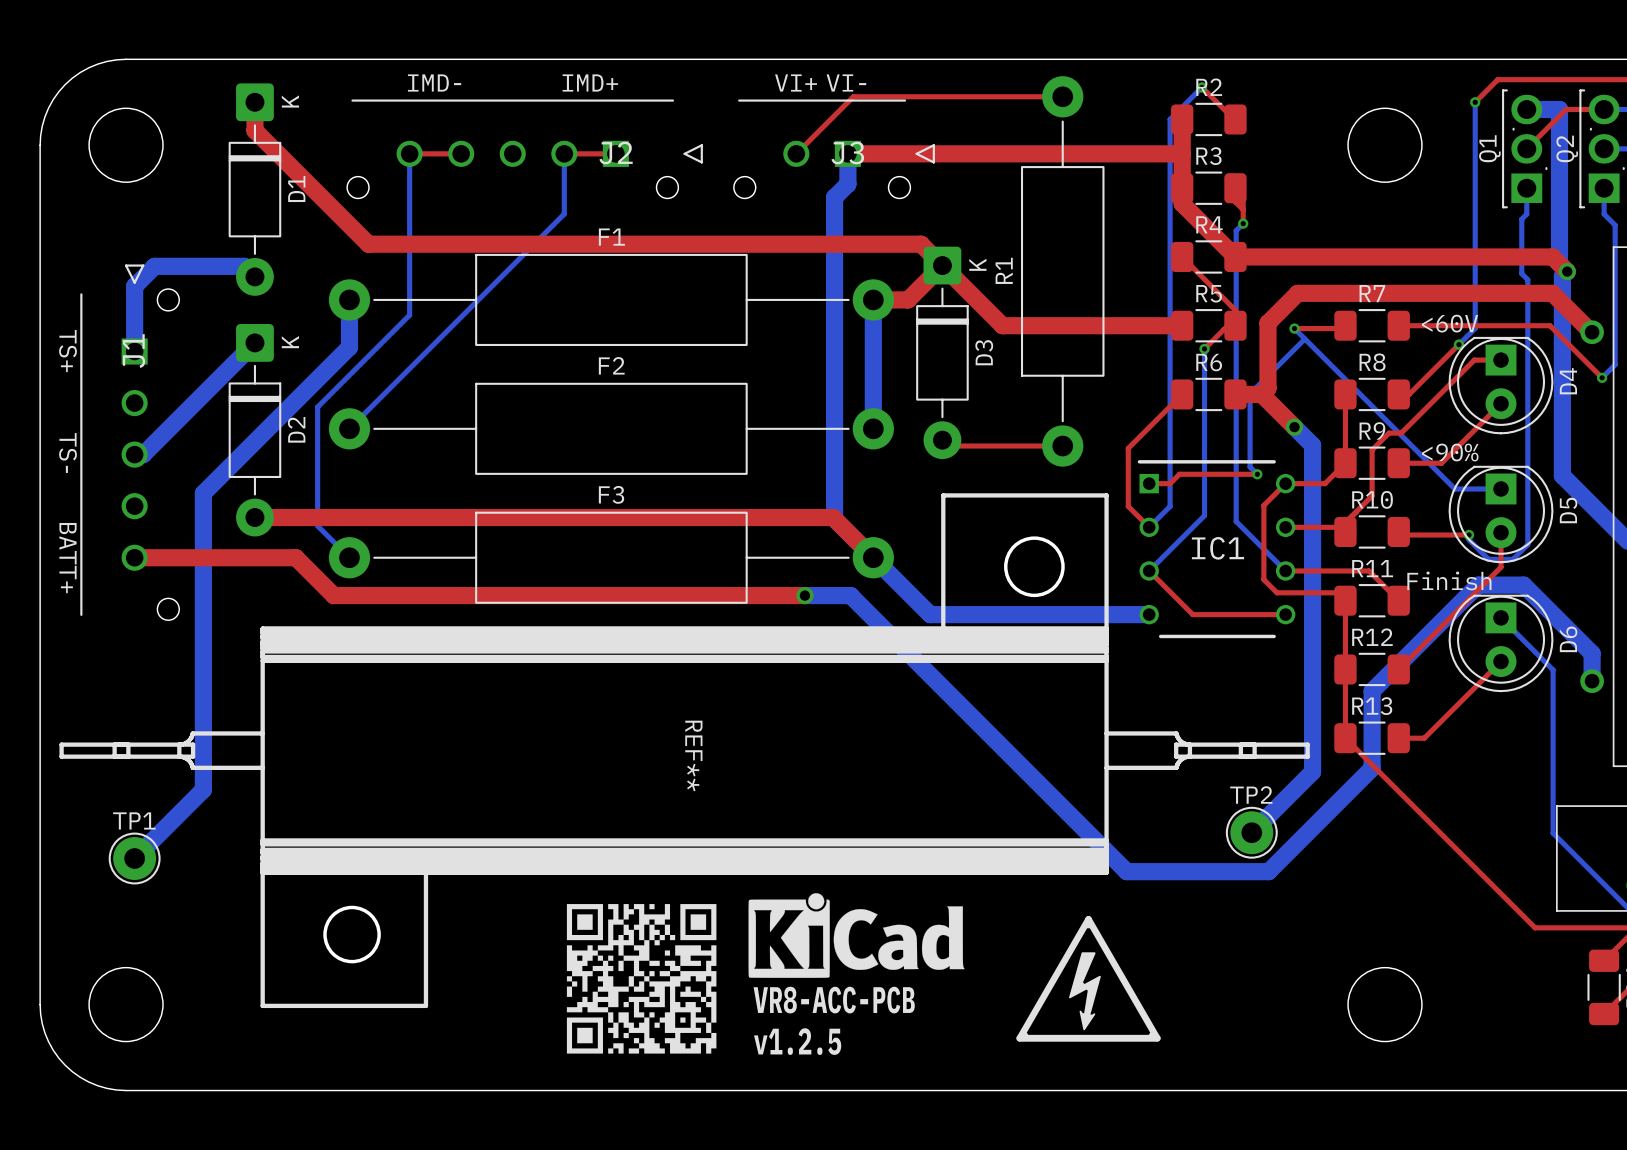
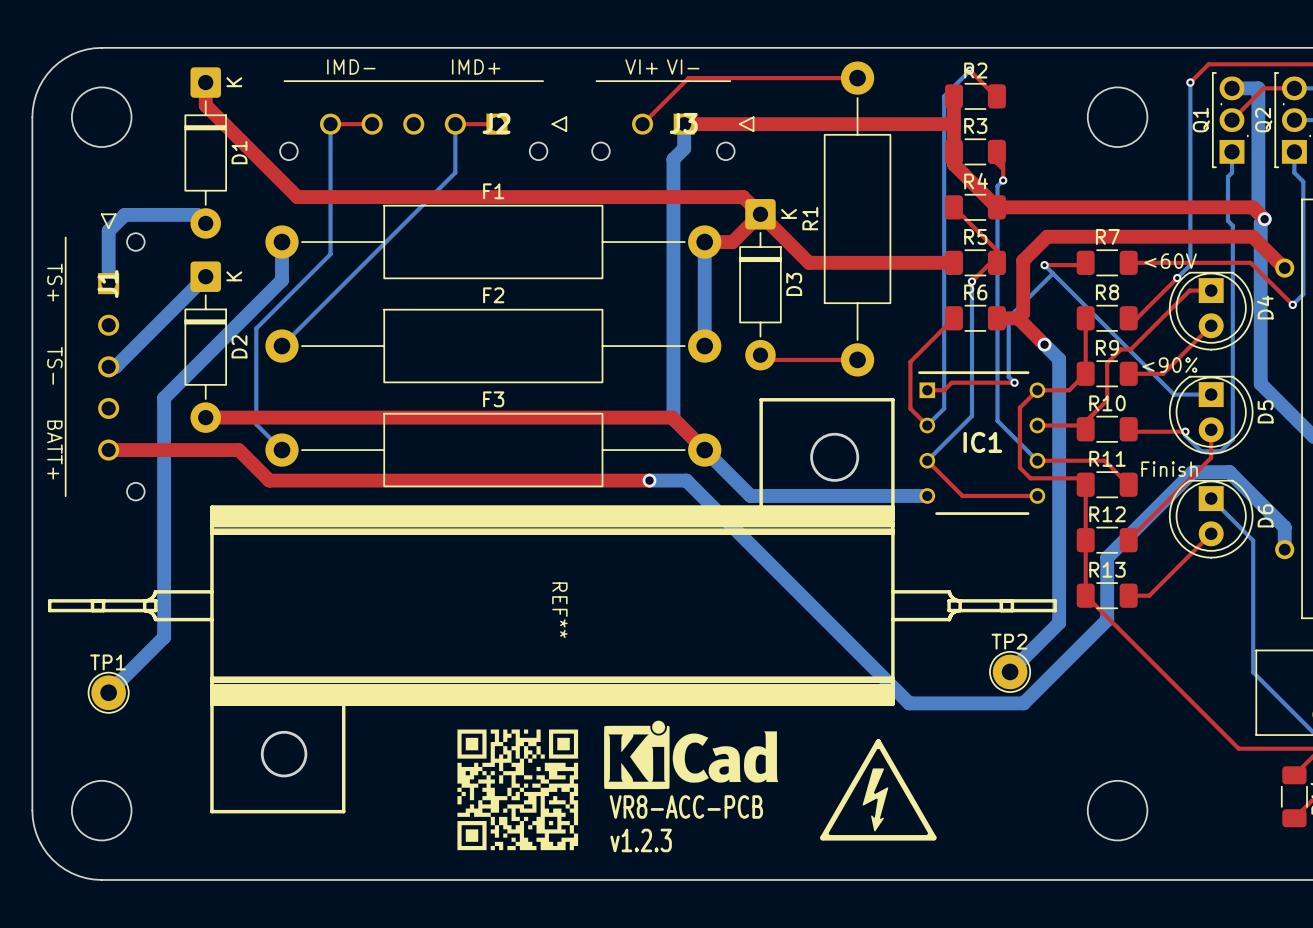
text: v1.2.5 (797, 1041) -> v1.2.3 (641, 840)

